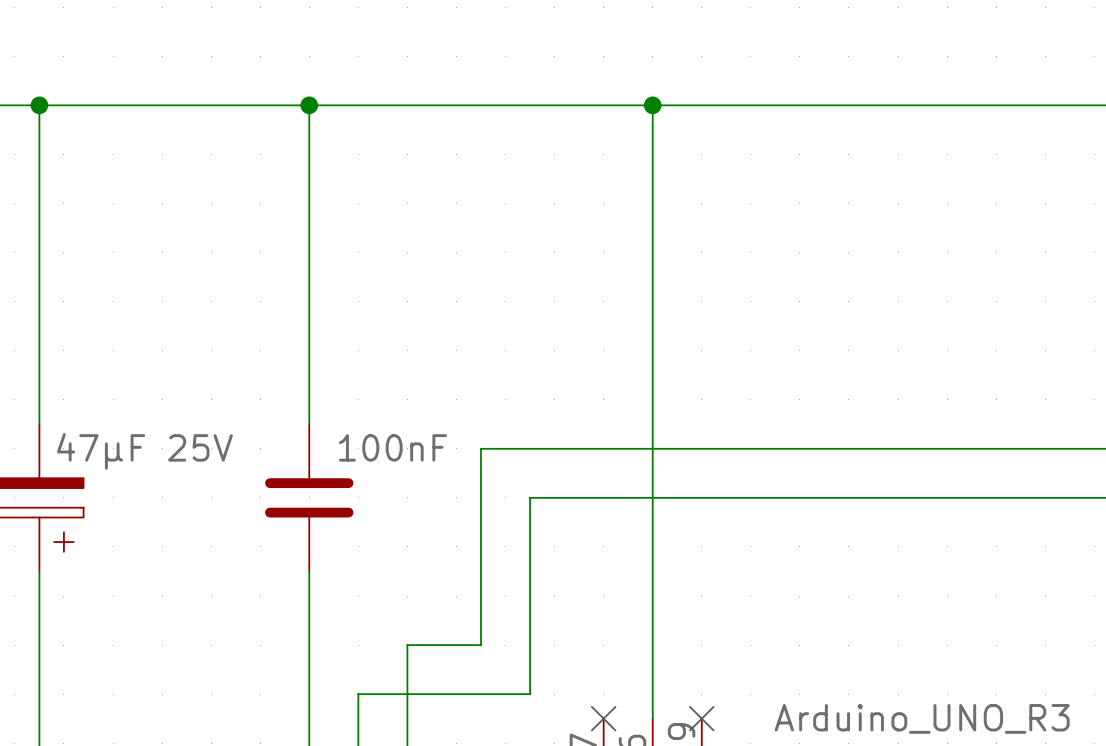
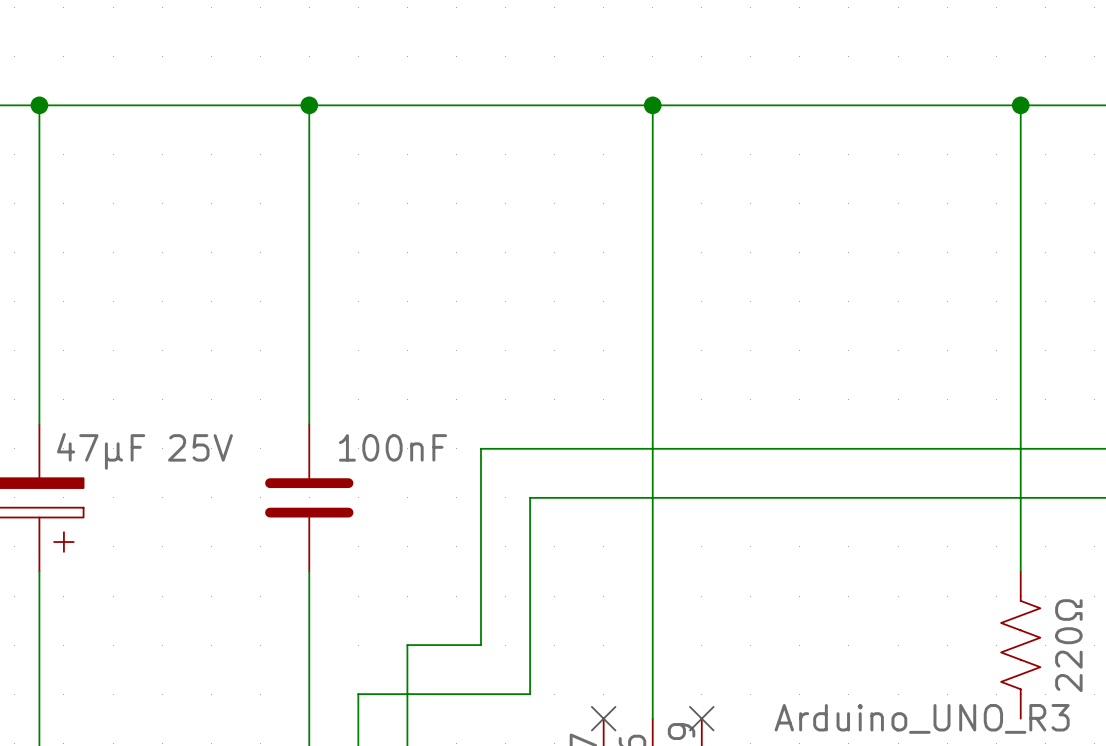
wire: none -> (1020, 105) (1020, 571)
junction: none -> (1020, 105)
part: none -> 220Ω (1020, 645)

